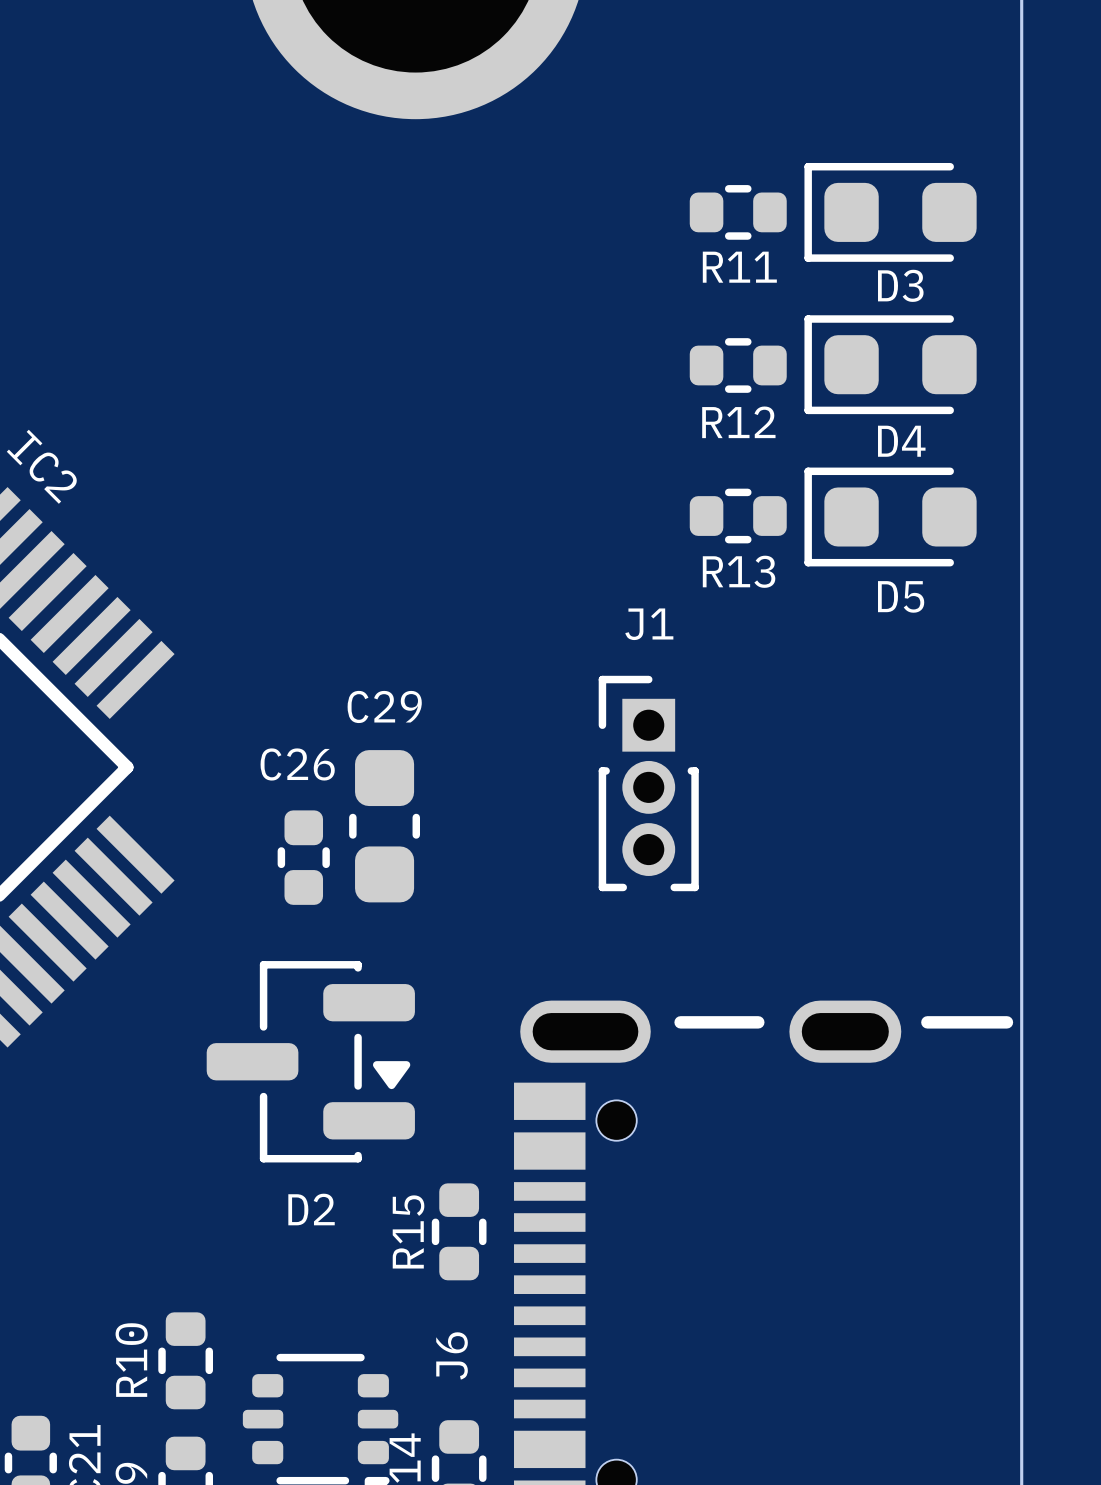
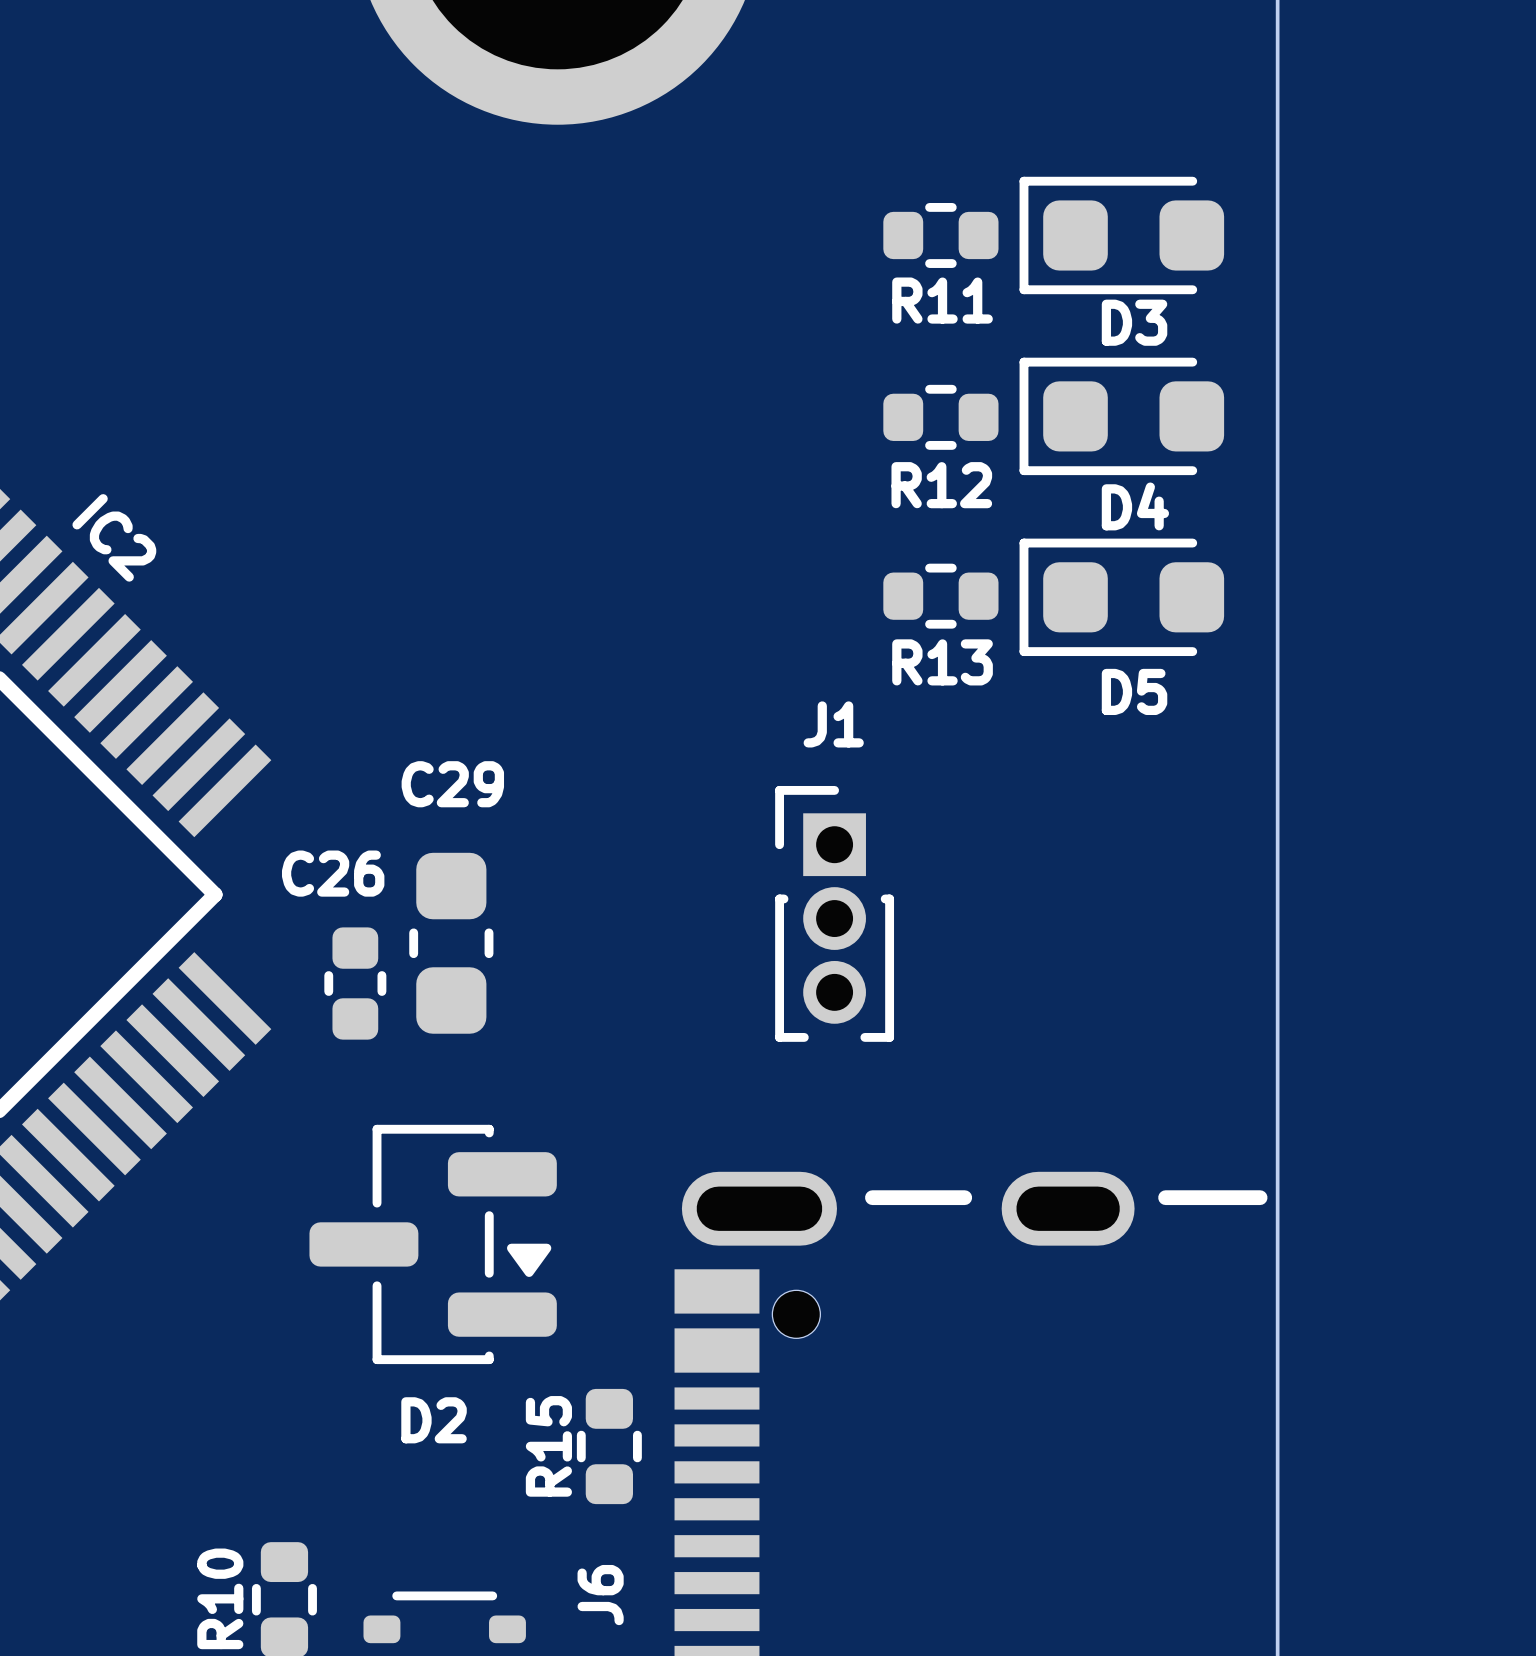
C29 name position: C29 (384, 706) -> C29 (452, 784)
C26 name position: C26 (297, 764) -> C26 (333, 873)
C29 position: (384, 826) -> (451, 943)
C26 position: (303, 857) -> (355, 983)

